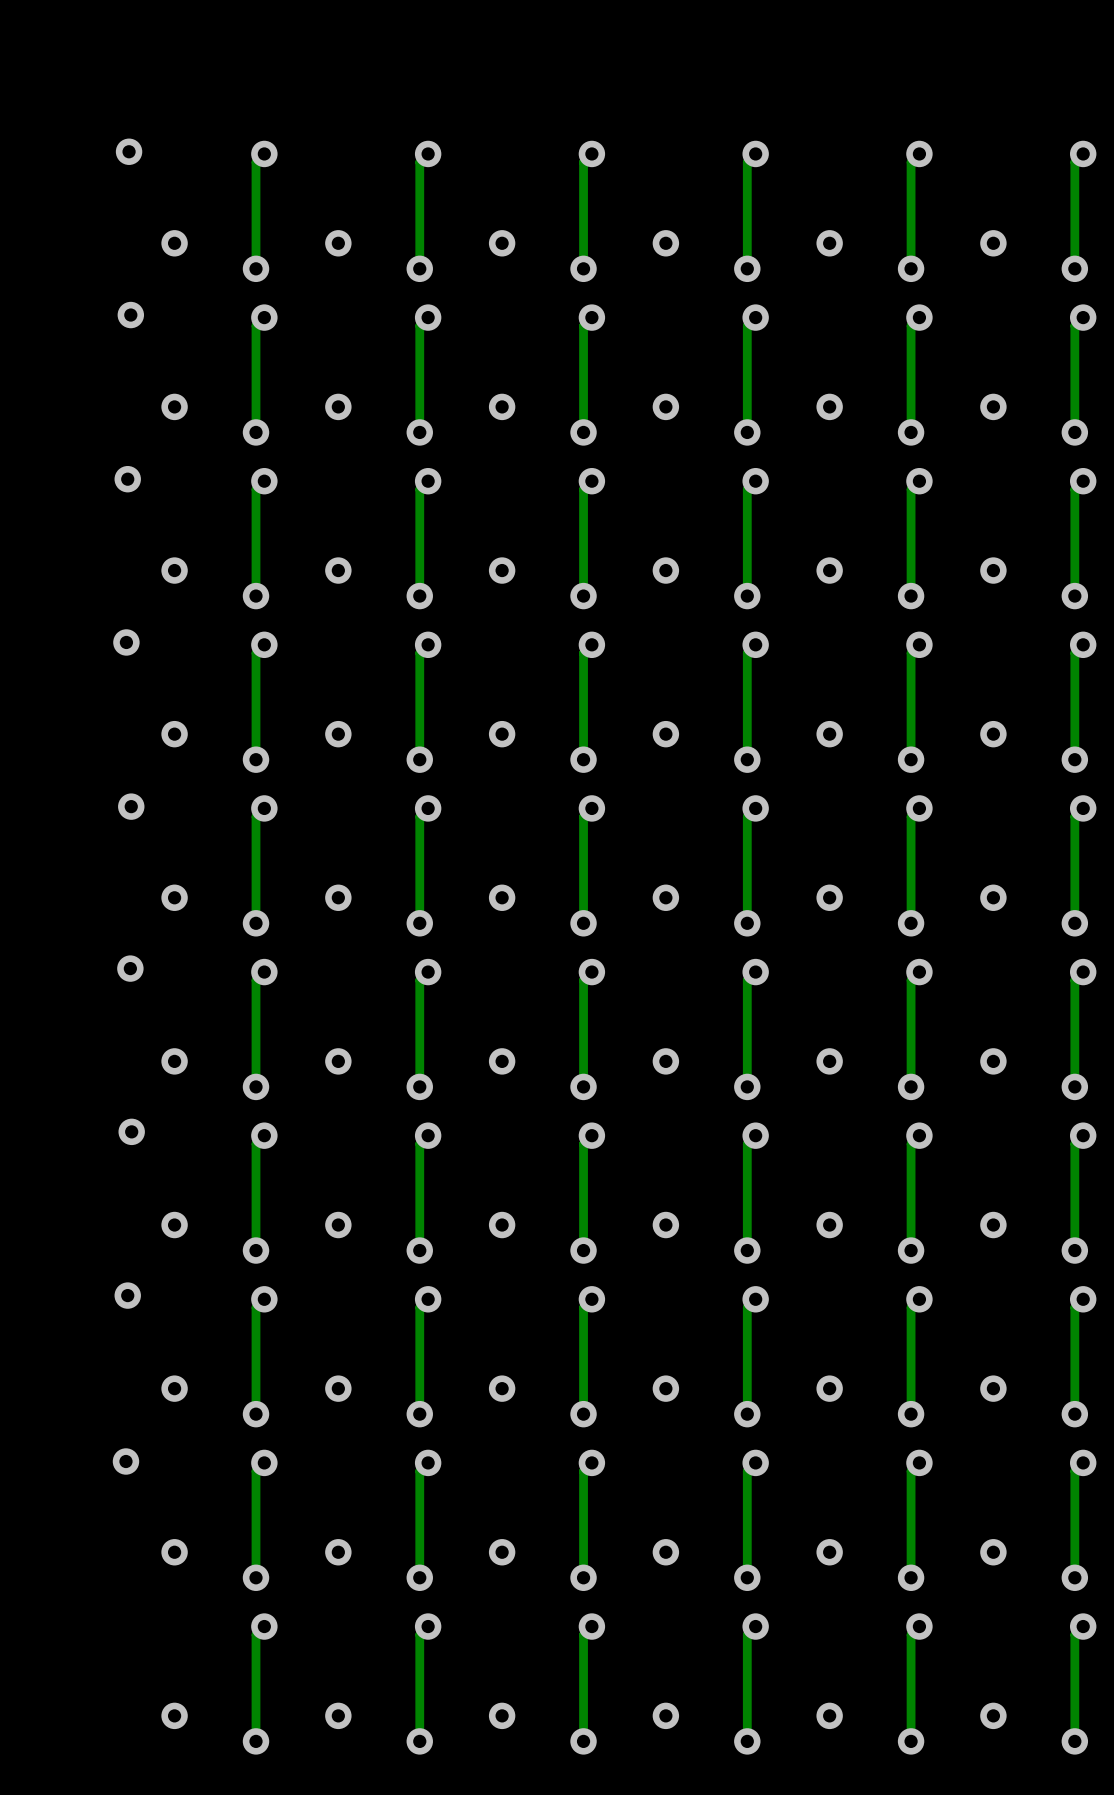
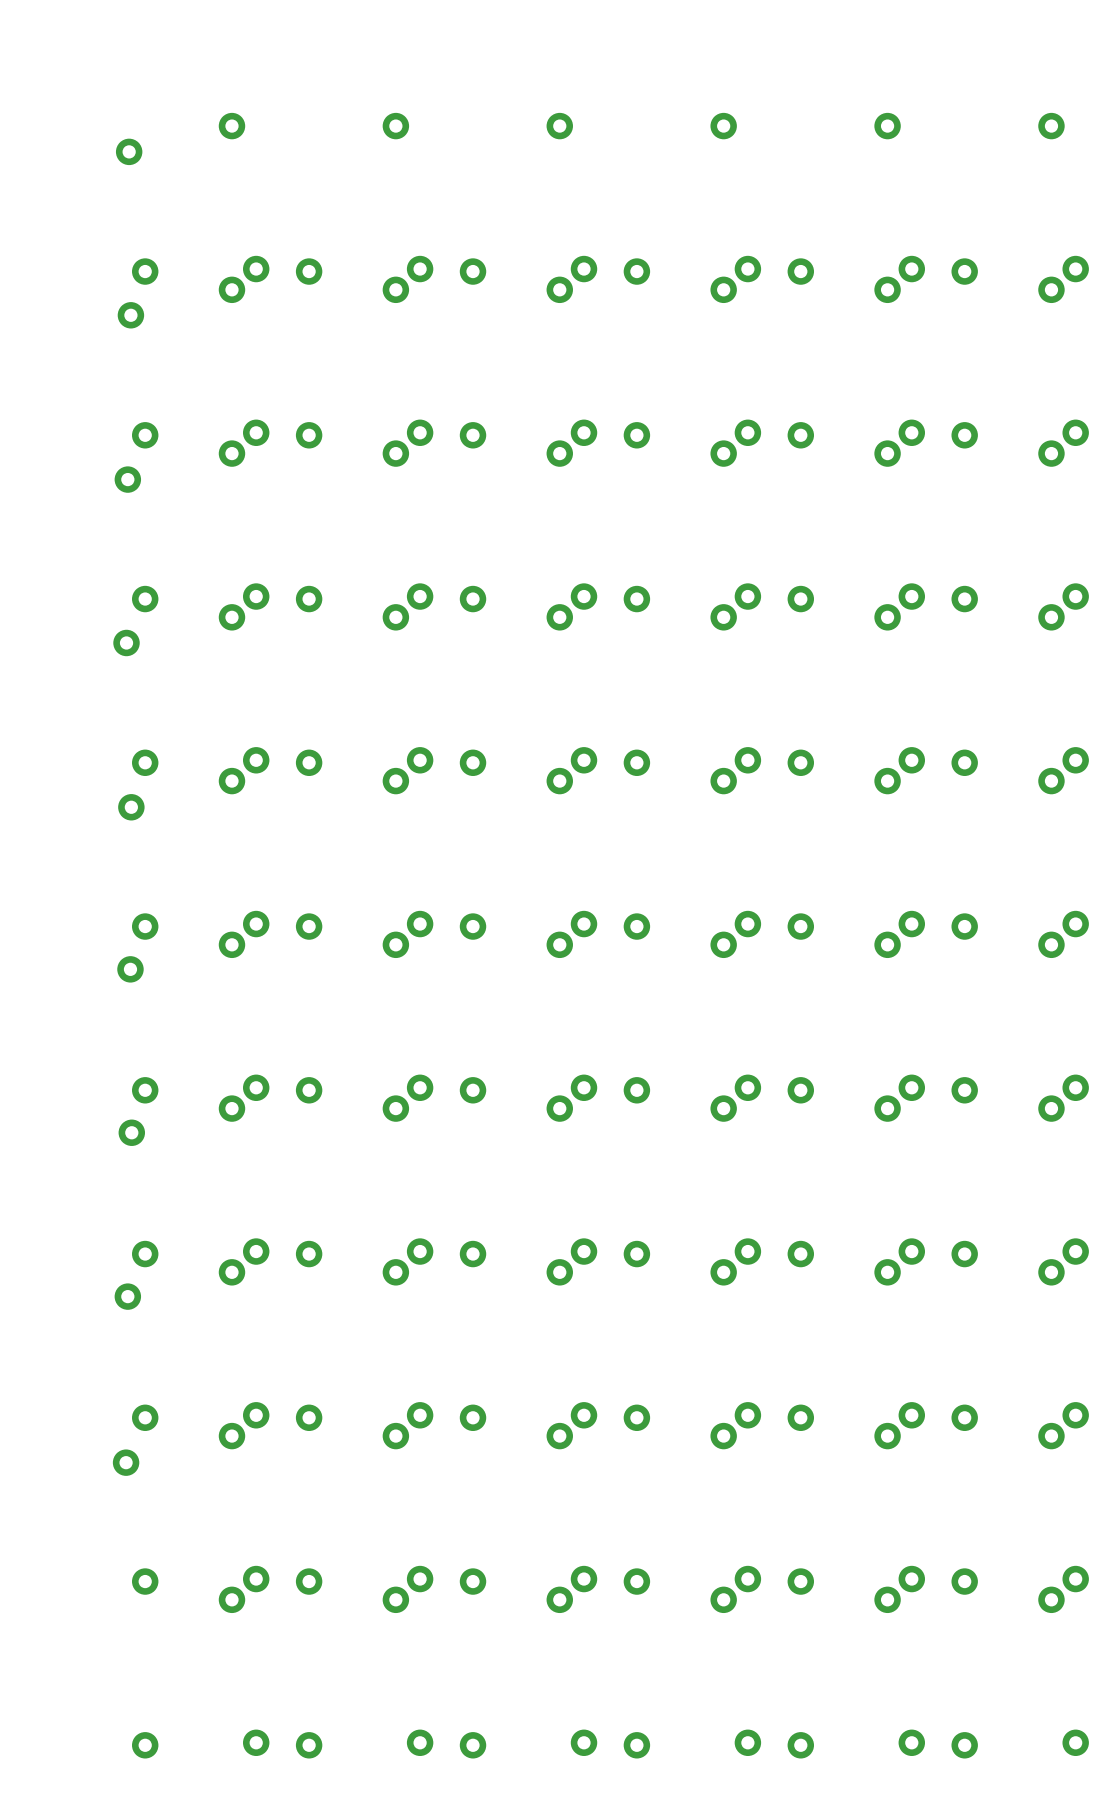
track: (264, 153) (256, 162) (256, 268) -> none
via position: (264, 153) -> (231, 126)
track: (428, 153) (419, 162) (419, 268) -> none
via position: (428, 153) -> (395, 126)
track: (591, 153) (583, 162) (583, 268) -> none
via position: (591, 153) -> (559, 126)
track: (755, 153) (747, 162) (747, 268) -> none
via position: (755, 153) -> (723, 126)
track: (919, 153) (911, 162) (911, 268) -> none
via position: (919, 153) -> (887, 126)
track: (1083, 153) (1074, 162) (1074, 268) -> none
via position: (1083, 153) -> (1051, 126)
via: (174, 243) -> none
via: (338, 243) -> none
via: (502, 243) -> none
via: (665, 243) -> none
via: (829, 243) -> none
via: (993, 243) -> none
via: none -> (145, 271)
via: none -> (309, 271)
via: none -> (473, 271)
via: none -> (636, 271)
via: none -> (800, 271)
via: none -> (964, 271)
via: none -> (231, 289)
via: none -> (395, 289)
via: none -> (559, 289)
via: none -> (723, 289)
via: none -> (887, 289)
via: none -> (1051, 289)
track: (264, 317) (256, 325) (256, 432) -> none
via: (264, 317) -> none
track: (428, 317) (419, 325) (419, 432) -> none
via: (428, 317) -> none
track: (591, 317) (583, 325) (583, 432) -> none
via: (591, 317) -> none
track: (755, 317) (747, 325) (747, 432) -> none
via: (755, 317) -> none
track: (919, 317) (911, 325) (911, 432) -> none
via: (919, 317) -> none
track: (1083, 317) (1074, 325) (1074, 432) -> none
via: (1083, 317) -> none
via: (174, 406) -> none
via: (338, 406) -> none
via: (502, 406) -> none
via: (665, 406) -> none
via: (829, 406) -> none
via: (993, 406) -> none
via: none -> (145, 435)
via: none -> (309, 435)
via: none -> (473, 435)
via: none -> (636, 435)
via: none -> (800, 435)
via: none -> (964, 435)
via: none -> (231, 453)
via: none -> (395, 453)
via: none -> (559, 453)
via: none -> (723, 453)
via: none -> (887, 453)
via: none -> (1051, 453)
track: (264, 481) (256, 489) (256, 596) -> none
via: (264, 481) -> none
track: (428, 481) (419, 489) (419, 596) -> none
via: (428, 481) -> none
track: (591, 481) (583, 489) (583, 596) -> none
via: (591, 481) -> none
track: (755, 481) (747, 489) (747, 596) -> none
via: (755, 481) -> none
track: (919, 481) (911, 489) (911, 596) -> none
via: (919, 481) -> none
track: (1083, 481) (1074, 489) (1074, 596) -> none
via: (1083, 481) -> none
via: (174, 570) -> none
via: (338, 570) -> none
via: (502, 570) -> none
via: (665, 570) -> none
via: (829, 570) -> none
via: (993, 570) -> none
via: none -> (145, 599)
via: none -> (309, 599)
via: none -> (473, 599)
via: none -> (636, 599)
via: none -> (800, 599)
via: none -> (964, 599)
via: none -> (231, 617)
via: none -> (395, 617)
via: none -> (559, 617)
via: none -> (723, 617)
via: none -> (887, 617)
via: none -> (1051, 617)
track: (264, 644) (256, 653) (256, 759) -> none
via: (264, 644) -> none
track: (428, 644) (419, 653) (419, 759) -> none
via: (428, 644) -> none
track: (591, 644) (583, 653) (583, 759) -> none
via: (591, 644) -> none
track: (755, 644) (747, 653) (747, 759) -> none
via: (755, 644) -> none
track: (919, 644) (911, 653) (911, 759) -> none
via: (919, 644) -> none
track: (1083, 644) (1074, 653) (1074, 759) -> none
via: (1083, 644) -> none
via: (174, 734) -> none
via: (338, 734) -> none
via: (502, 734) -> none
via: (665, 734) -> none
via: (829, 734) -> none
via: (993, 734) -> none
via: none -> (145, 762)
via: none -> (309, 762)
via: none -> (473, 762)
via: none -> (636, 762)
via: none -> (800, 762)
via: none -> (964, 762)
via: none -> (231, 781)
via: none -> (395, 781)
via: none -> (559, 781)
via: none -> (723, 781)
via: none -> (887, 781)
via: none -> (1051, 781)
track: (264, 808) (256, 816) (256, 923) -> none
via: (264, 808) -> none
track: (428, 808) (419, 816) (419, 923) -> none
via: (428, 808) -> none
track: (591, 808) (583, 816) (583, 923) -> none
via: (591, 808) -> none
track: (755, 808) (747, 816) (747, 923) -> none
via: (755, 808) -> none
track: (919, 808) (911, 816) (911, 923) -> none
via: (919, 808) -> none
track: (1083, 808) (1074, 816) (1074, 923) -> none
via: (1083, 808) -> none
via: (174, 897) -> none
via: (338, 897) -> none
via: (502, 897) -> none
via: (665, 897) -> none
via: (829, 897) -> none
via: (993, 897) -> none
via: none -> (145, 926)
via: none -> (309, 926)
via: none -> (473, 926)
via: none -> (636, 926)
via: none -> (800, 926)
via: none -> (964, 926)
via: none -> (231, 944)
via: none -> (395, 944)
via: none -> (559, 944)
via: none -> (723, 944)
via: none -> (887, 944)
via: none -> (1051, 944)
track: (264, 972) (256, 980) (256, 1086) -> none
via: (264, 972) -> none
track: (428, 972) (419, 980) (419, 1086) -> none
via: (428, 972) -> none
track: (591, 972) (583, 980) (583, 1086) -> none
via: (591, 972) -> none
track: (755, 972) (747, 980) (747, 1086) -> none
via: (755, 972) -> none
track: (919, 972) (911, 980) (911, 1086) -> none
via: (919, 972) -> none
track: (1083, 972) (1074, 980) (1074, 1086) -> none
via: (1083, 972) -> none
via: (174, 1061) -> none
via: (338, 1061) -> none
via: (502, 1061) -> none
via: (665, 1061) -> none
via: (829, 1061) -> none
via: (993, 1061) -> none
via: none -> (145, 1090)
via: none -> (309, 1090)
via: none -> (473, 1090)
via: none -> (636, 1090)
via: none -> (800, 1090)
via: none -> (964, 1090)
via: none -> (231, 1108)
via: none -> (395, 1108)
via: none -> (559, 1108)
via: none -> (723, 1108)
via: none -> (887, 1108)
via: none -> (1051, 1108)
track: (264, 1135) (256, 1144) (256, 1250) -> none
via: (264, 1135) -> none
track: (428, 1135) (419, 1144) (419, 1250) -> none
via: (428, 1135) -> none
track: (591, 1135) (583, 1144) (583, 1250) -> none
via: (591, 1135) -> none
track: (755, 1135) (747, 1144) (747, 1250) -> none
via: (755, 1135) -> none
track: (919, 1135) (911, 1144) (911, 1250) -> none
via: (919, 1135) -> none
track: (1083, 1135) (1074, 1144) (1074, 1250) -> none
via: (1083, 1135) -> none
via: (174, 1225) -> none
via: (338, 1225) -> none
via: (502, 1225) -> none
via: (665, 1225) -> none
via: (829, 1225) -> none
via: (993, 1225) -> none
via: none -> (145, 1254)
via: none -> (309, 1254)
via: none -> (473, 1254)
via: none -> (636, 1254)
via: none -> (800, 1254)
via: none -> (964, 1254)
via: none -> (231, 1272)
via: none -> (395, 1272)
via: none -> (559, 1272)
via: none -> (723, 1272)
via: none -> (887, 1272)
via: none -> (1051, 1272)
track: (264, 1299) (256, 1307) (256, 1414) -> none
via: (264, 1299) -> none
track: (428, 1299) (419, 1307) (419, 1414) -> none
via: (428, 1299) -> none
track: (591, 1299) (583, 1307) (583, 1414) -> none
via: (591, 1299) -> none
track: (755, 1299) (747, 1307) (747, 1414) -> none
via: (755, 1299) -> none
track: (919, 1299) (911, 1307) (911, 1414) -> none
via: (919, 1299) -> none
track: (1083, 1299) (1074, 1307) (1074, 1414) -> none
via: (1083, 1299) -> none
via: (174, 1388) -> none
via: (338, 1388) -> none
via: (502, 1388) -> none
via: (665, 1388) -> none
via: (829, 1388) -> none
via: (993, 1388) -> none
via: none -> (145, 1417)
via: none -> (309, 1417)
via: none -> (473, 1417)
via: none -> (636, 1417)
via: none -> (800, 1417)
via: none -> (964, 1417)
via: none -> (231, 1436)
via: none -> (395, 1436)
via: none -> (559, 1436)
via: none -> (723, 1436)
via: none -> (887, 1436)
via: none -> (1051, 1436)
track: (264, 1462) (256, 1471) (256, 1577) -> none
via: (264, 1462) -> none
track: (428, 1462) (419, 1471) (419, 1577) -> none
via: (428, 1462) -> none
track: (591, 1462) (583, 1471) (583, 1577) -> none
via: (591, 1462) -> none
track: (755, 1462) (747, 1471) (747, 1577) -> none
via: (755, 1462) -> none
track: (919, 1462) (911, 1471) (911, 1577) -> none
via: (919, 1462) -> none
track: (1083, 1462) (1074, 1471) (1074, 1577) -> none
via: (1083, 1462) -> none
via: (174, 1552) -> none
via: (338, 1552) -> none
via: (502, 1552) -> none
via: (665, 1552) -> none
via: (829, 1552) -> none
via: (993, 1552) -> none
via: none -> (145, 1581)
via: none -> (309, 1581)
via: none -> (473, 1581)
via: none -> (636, 1581)
via: none -> (800, 1581)
via: none -> (964, 1581)
via: none -> (231, 1599)
via: none -> (395, 1599)
via: none -> (559, 1599)
via: none -> (723, 1599)
via: none -> (887, 1599)
via: none -> (1051, 1599)
track: (264, 1626) (256, 1634) (256, 1741) -> none
via: (264, 1626) -> none
track: (428, 1626) (419, 1634) (419, 1741) -> none
via: (428, 1626) -> none
track: (591, 1626) (583, 1634) (583, 1741) -> none
via: (591, 1626) -> none
track: (755, 1626) (747, 1634) (747, 1741) -> none
via: (755, 1626) -> none
track: (919, 1626) (911, 1634) (911, 1741) -> none
via: (919, 1626) -> none
track: (1083, 1626) (1074, 1634) (1074, 1741) -> none
via: (1083, 1626) -> none
via position: (174, 1715) -> (145, 1745)
via position: (338, 1715) -> (309, 1745)
via position: (502, 1715) -> (473, 1745)
via position: (665, 1715) -> (636, 1745)
via position: (829, 1715) -> (800, 1745)
via position: (993, 1715) -> (964, 1745)

